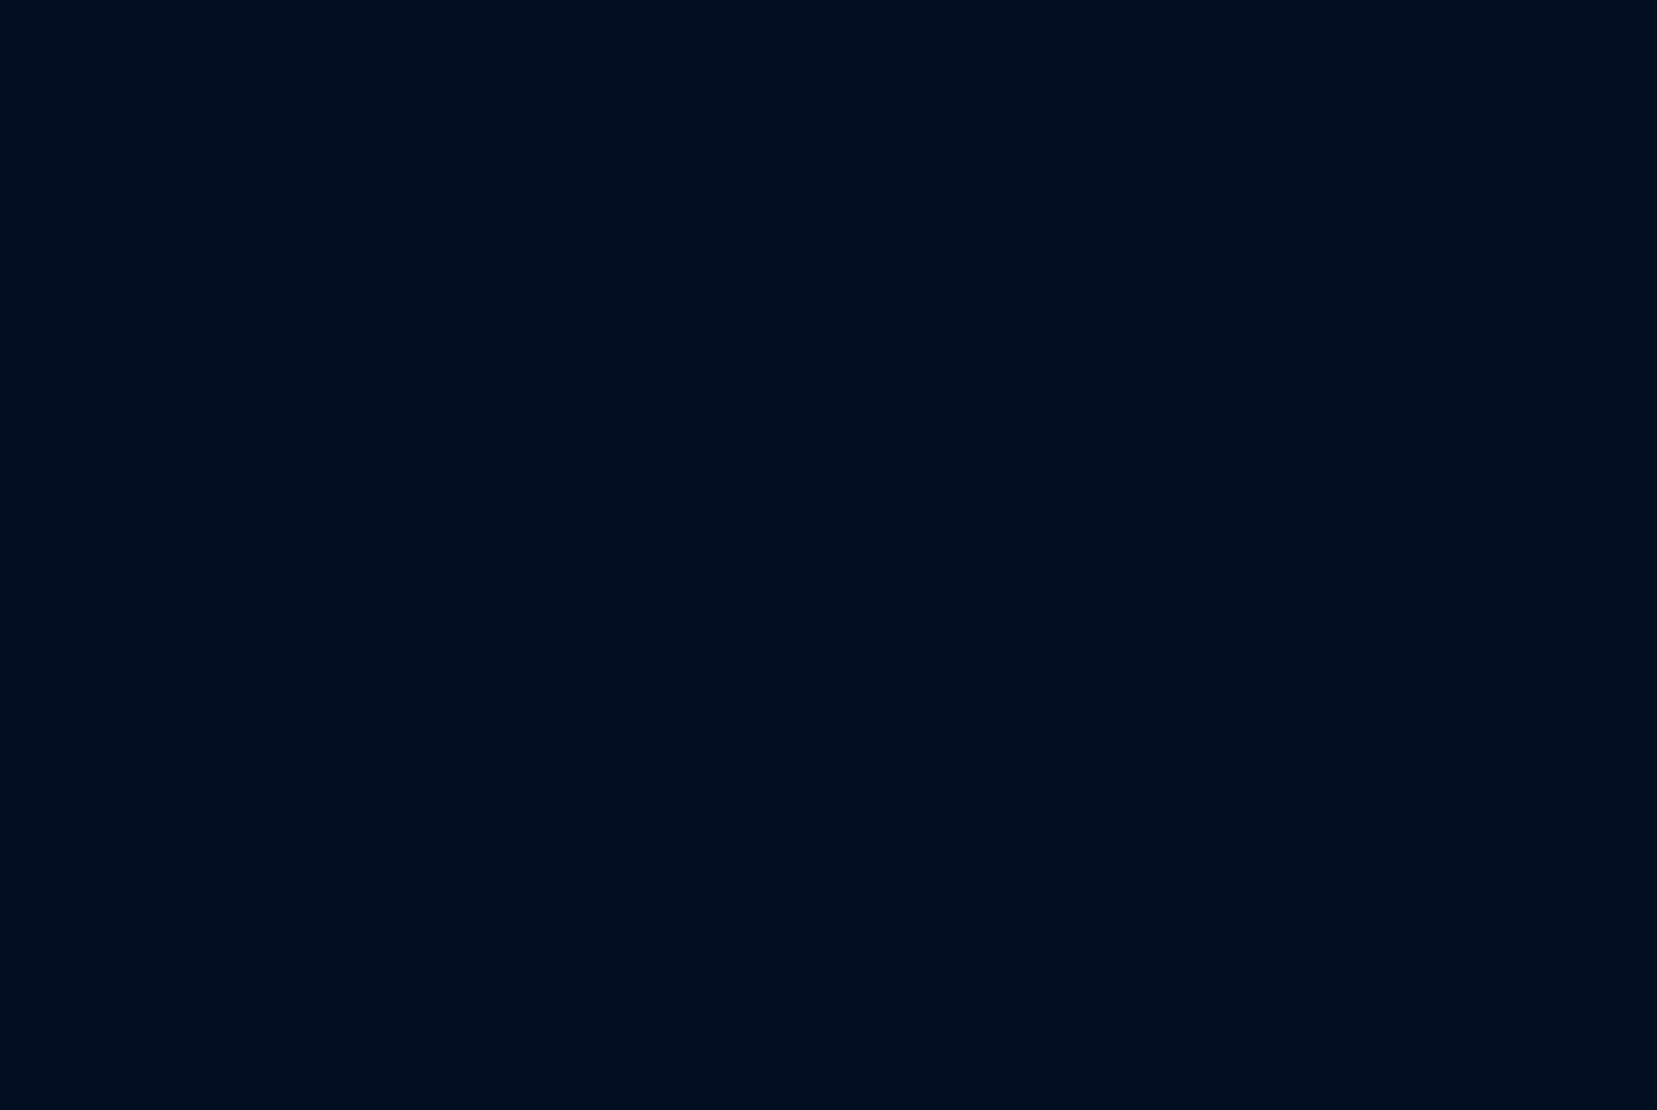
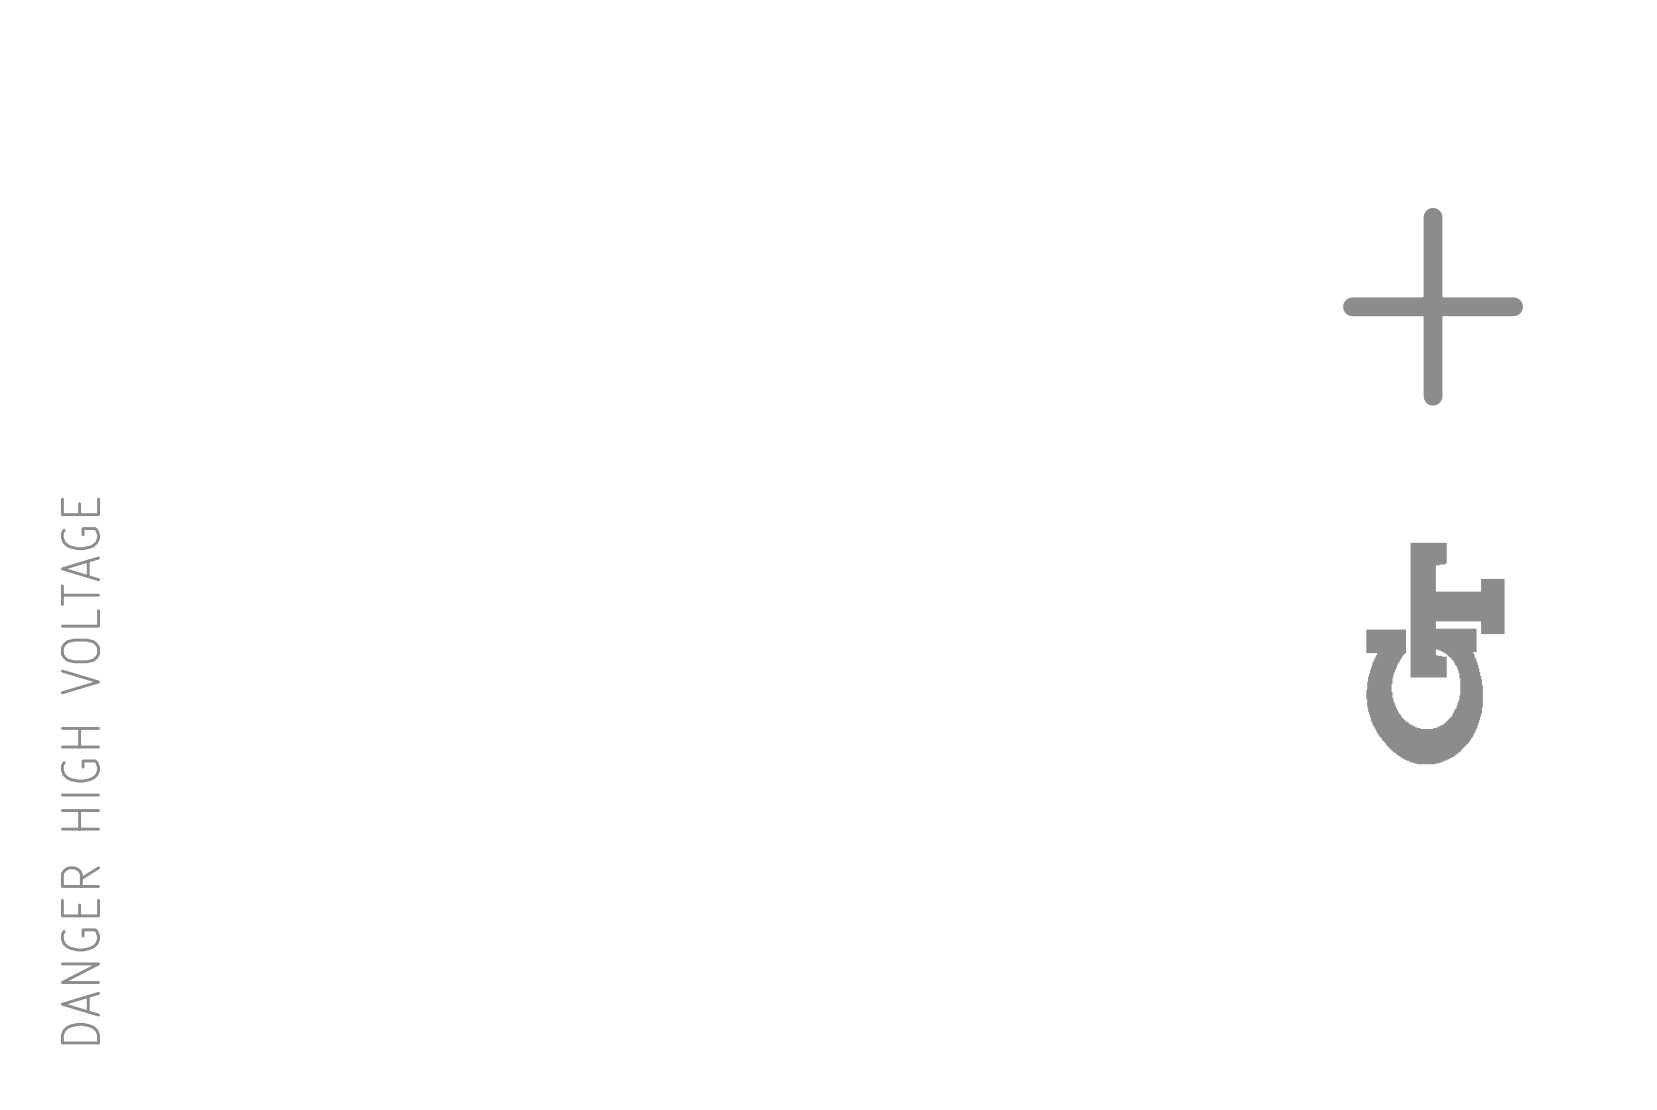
text: none -> + (1433, 306)
drawing: none -> [1366, 542, 1505, 765]
text: none -> DANGER HIGH VOLTAGE (80, 771)

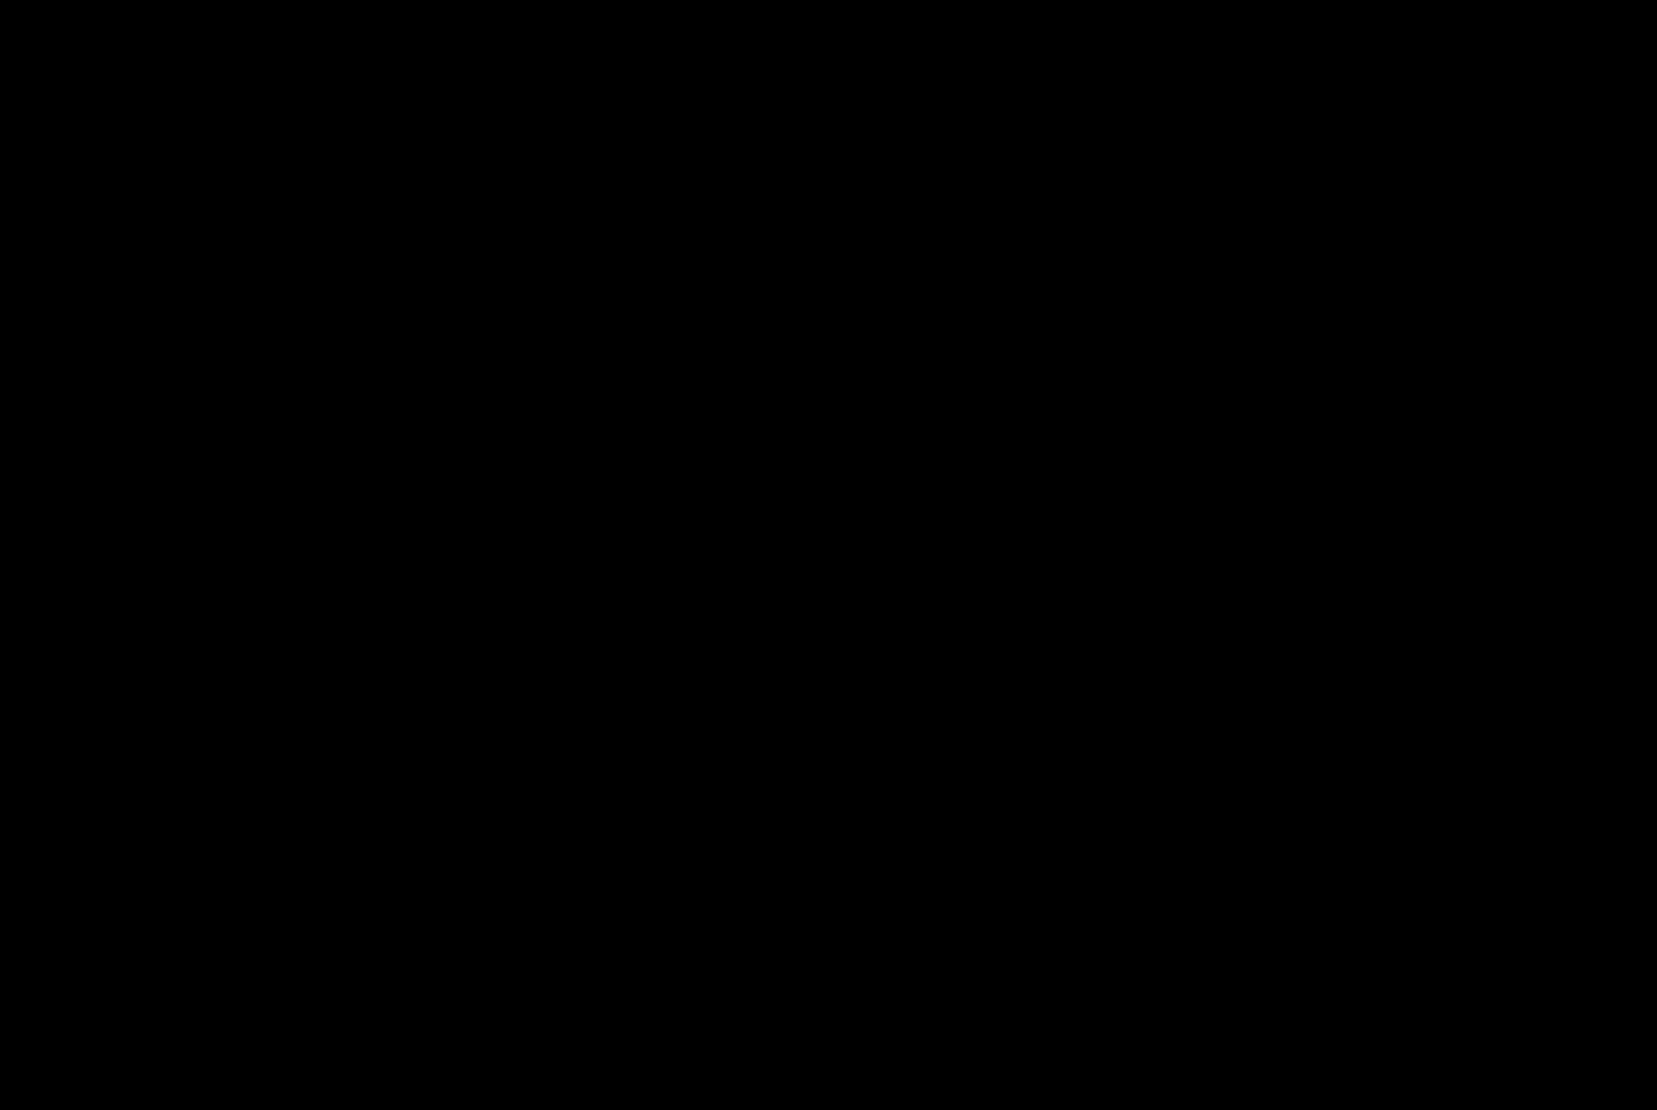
text: + (1433, 306) -> none
drawing: [1366, 542, 1505, 765] -> none
text: DANGER HIGH VOLTAGE (80, 771) -> none

